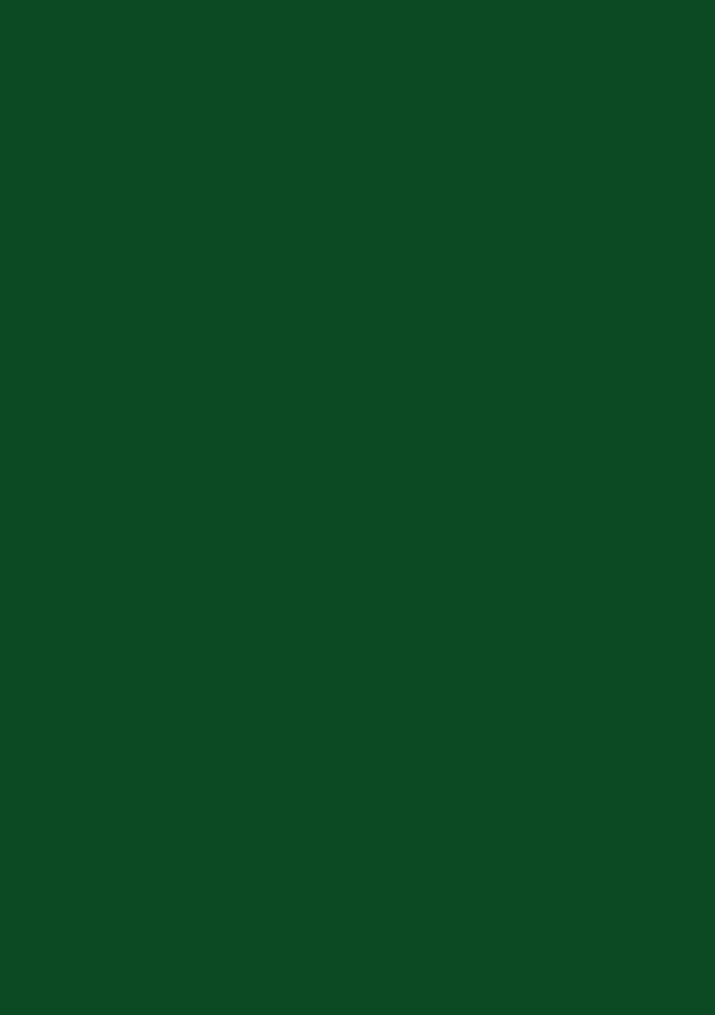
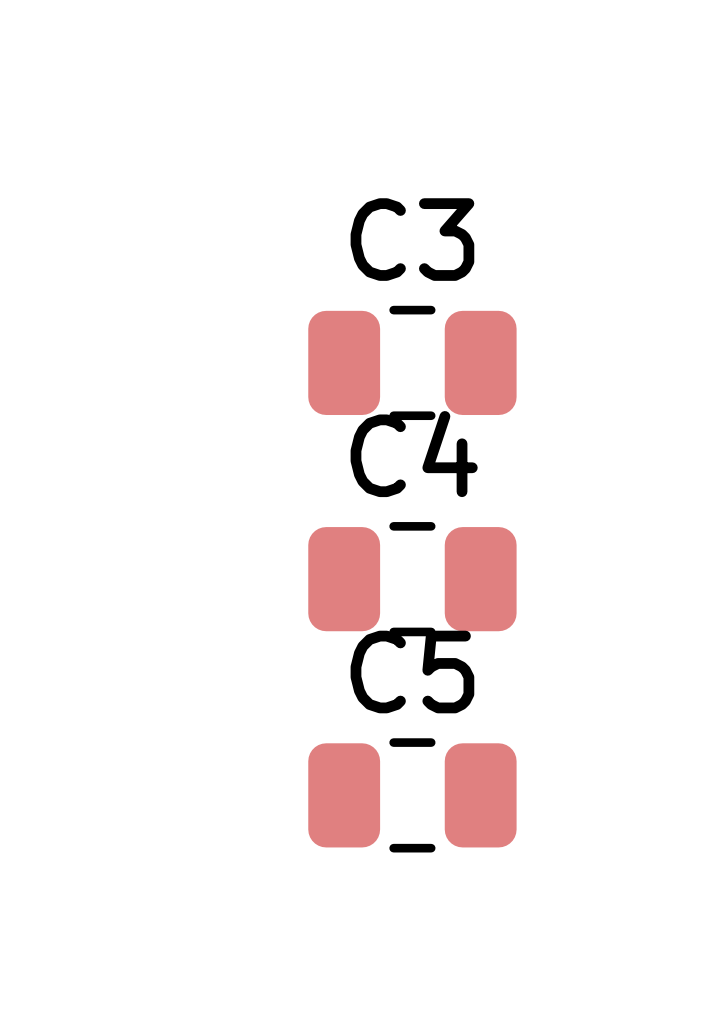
C3: none -> (412, 362)
C4: none -> (412, 579)
C5: none -> (412, 795)

